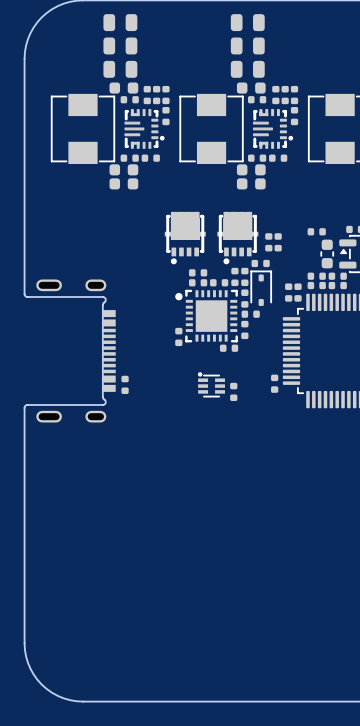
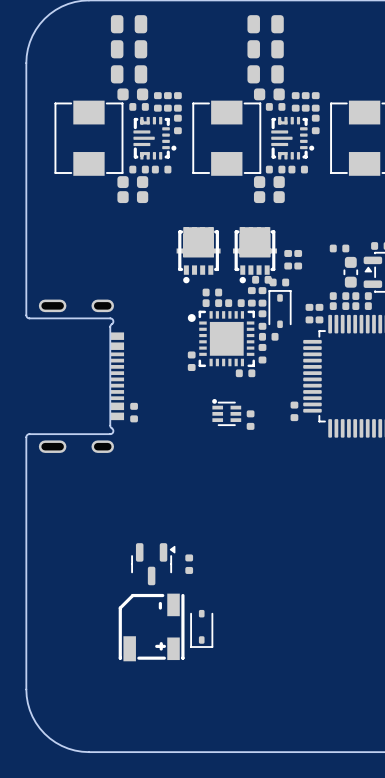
part: none -> (261, 279)
part: none -> (153, 564)
part: none -> (189, 564)
part: none -> (151, 627)
part: none -> (201, 628)

